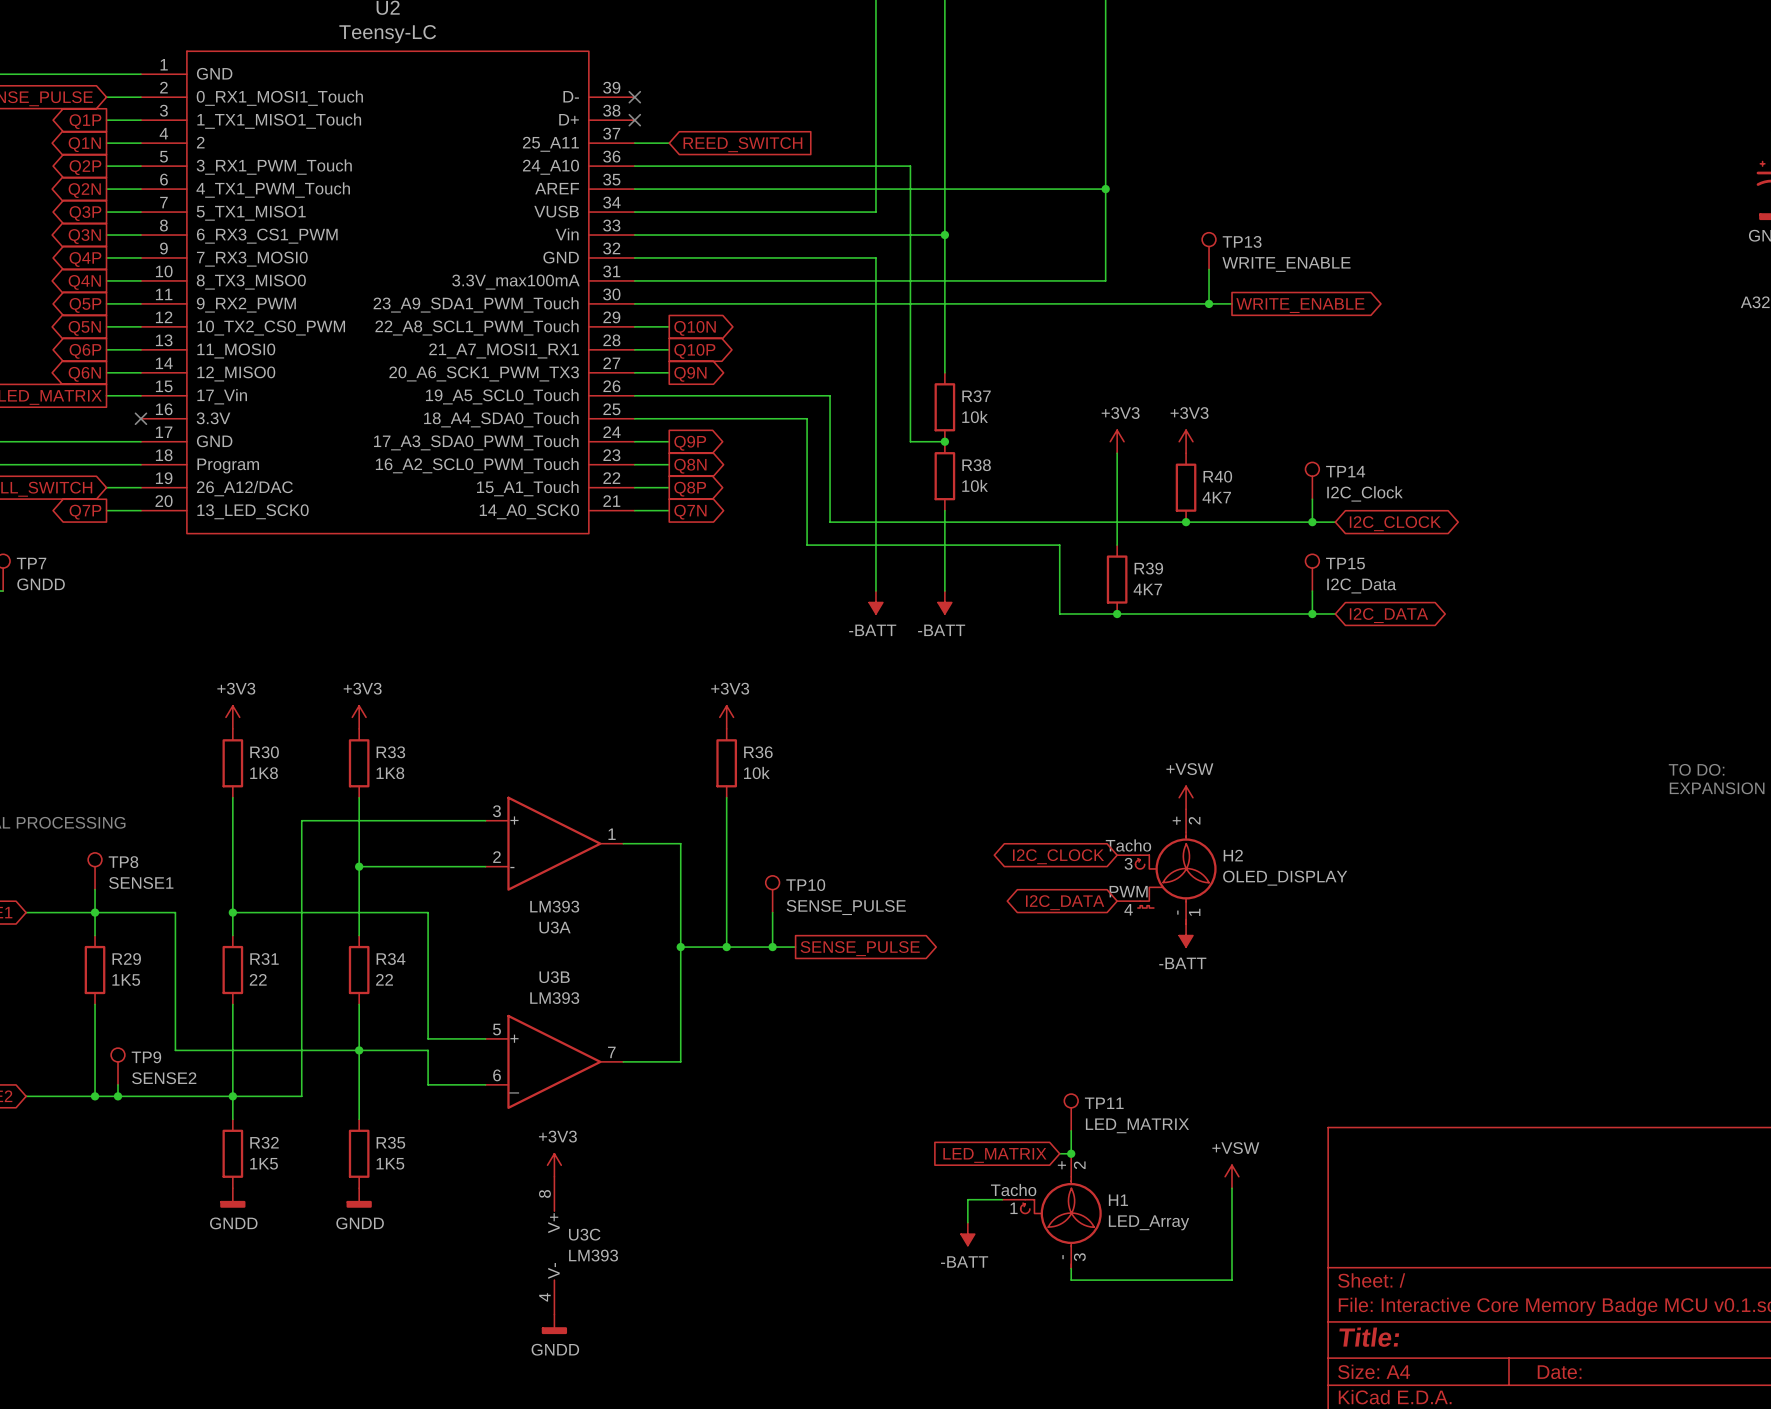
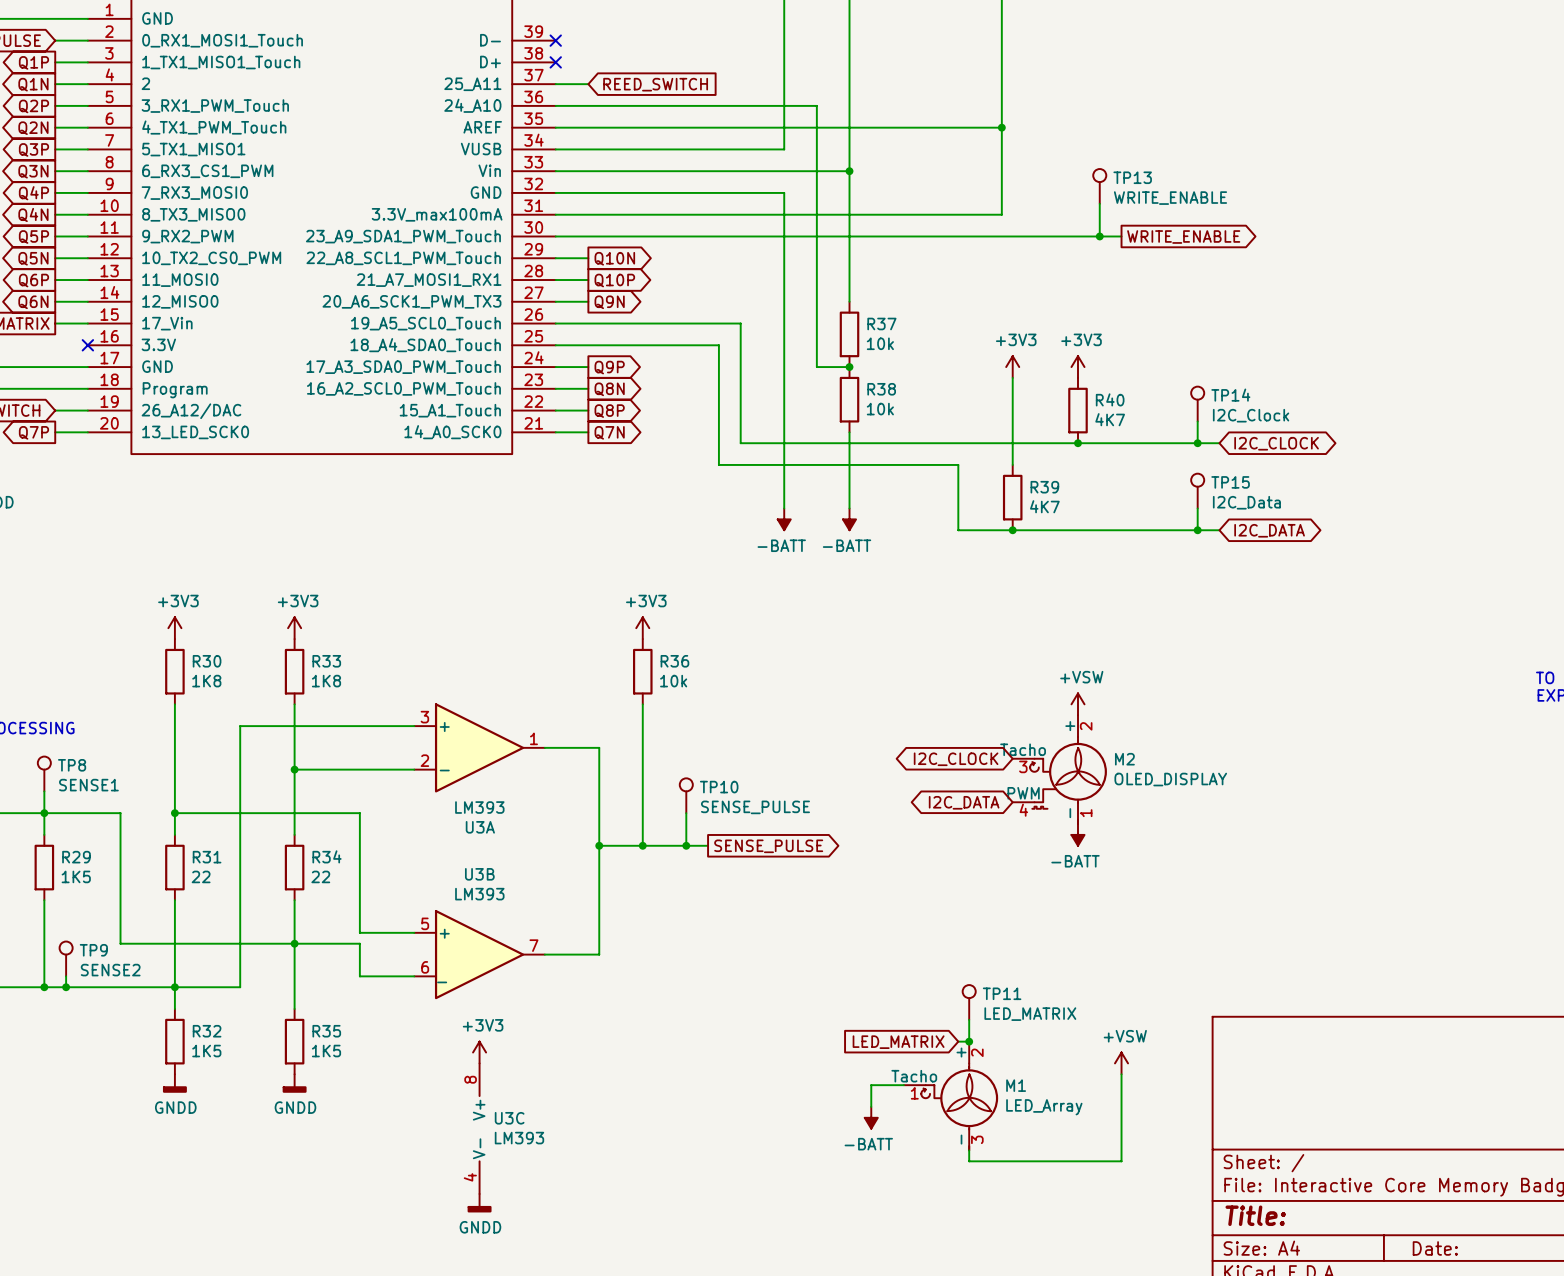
H2 name: H2 (1233, 855) -> M2 (1124, 759)
H1 name: H1 (1118, 1200) -> M1 (1016, 1085)

